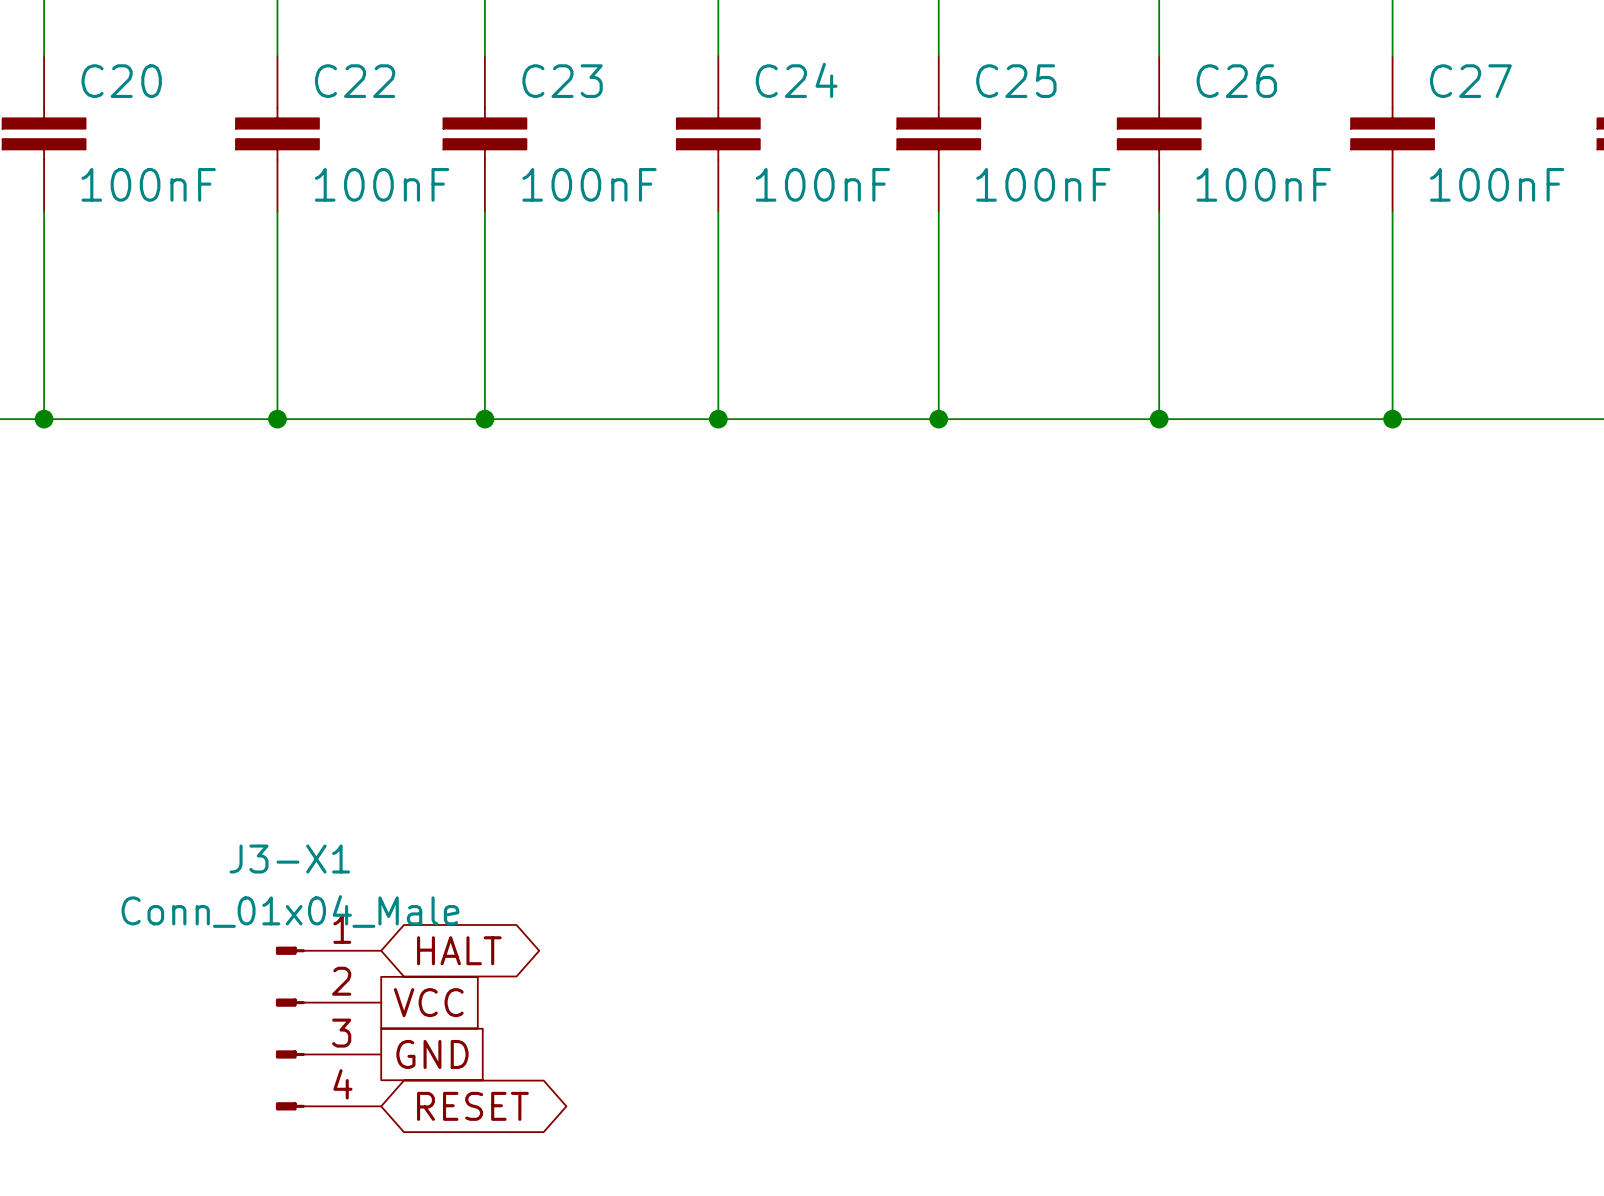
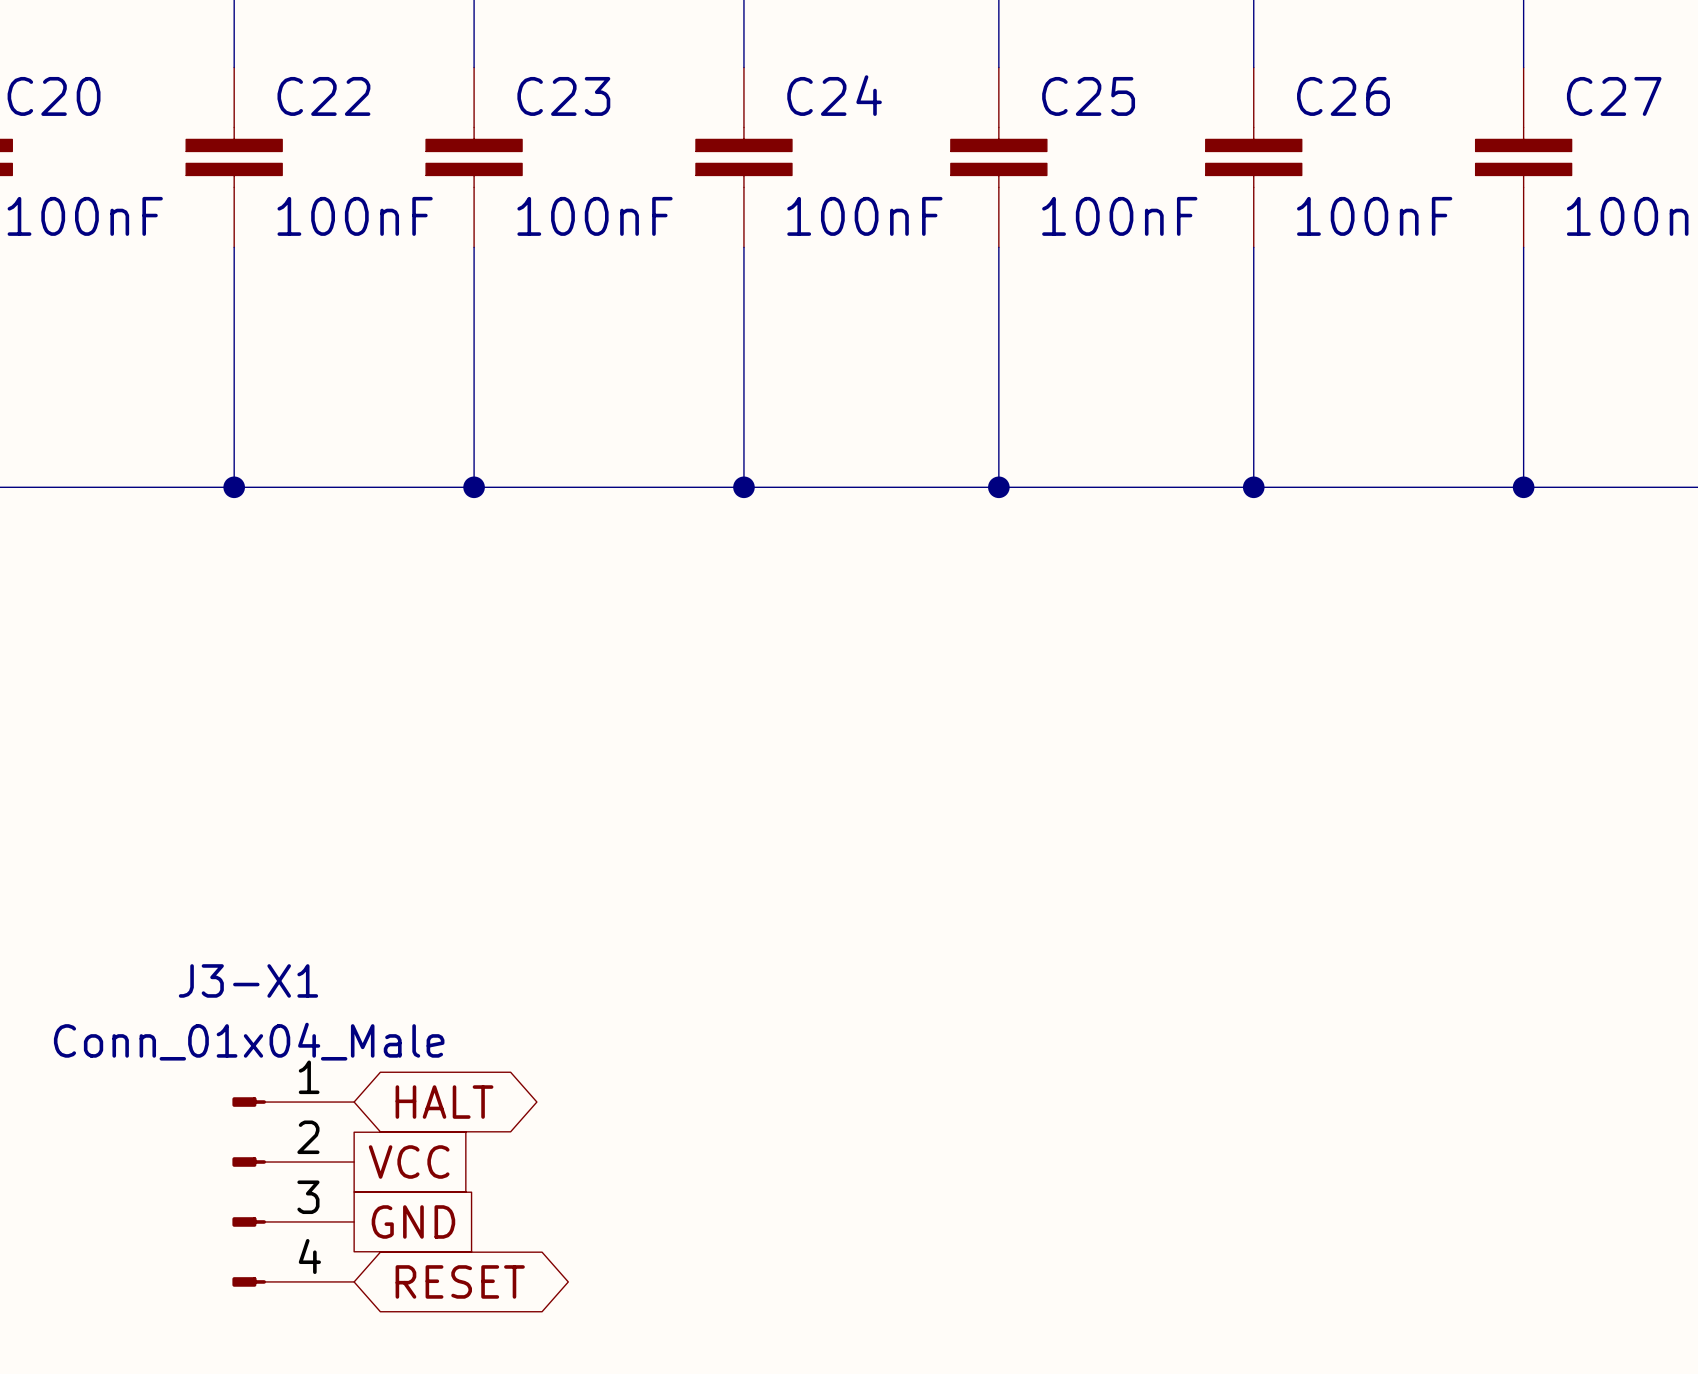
J3-X1 name position: J3-X1 (289, 859) -> J3-X1 (248, 980)
J3-X1 value position: Conn_01x04_Male (290, 911) -> Conn_01x04_Male (249, 1041)

